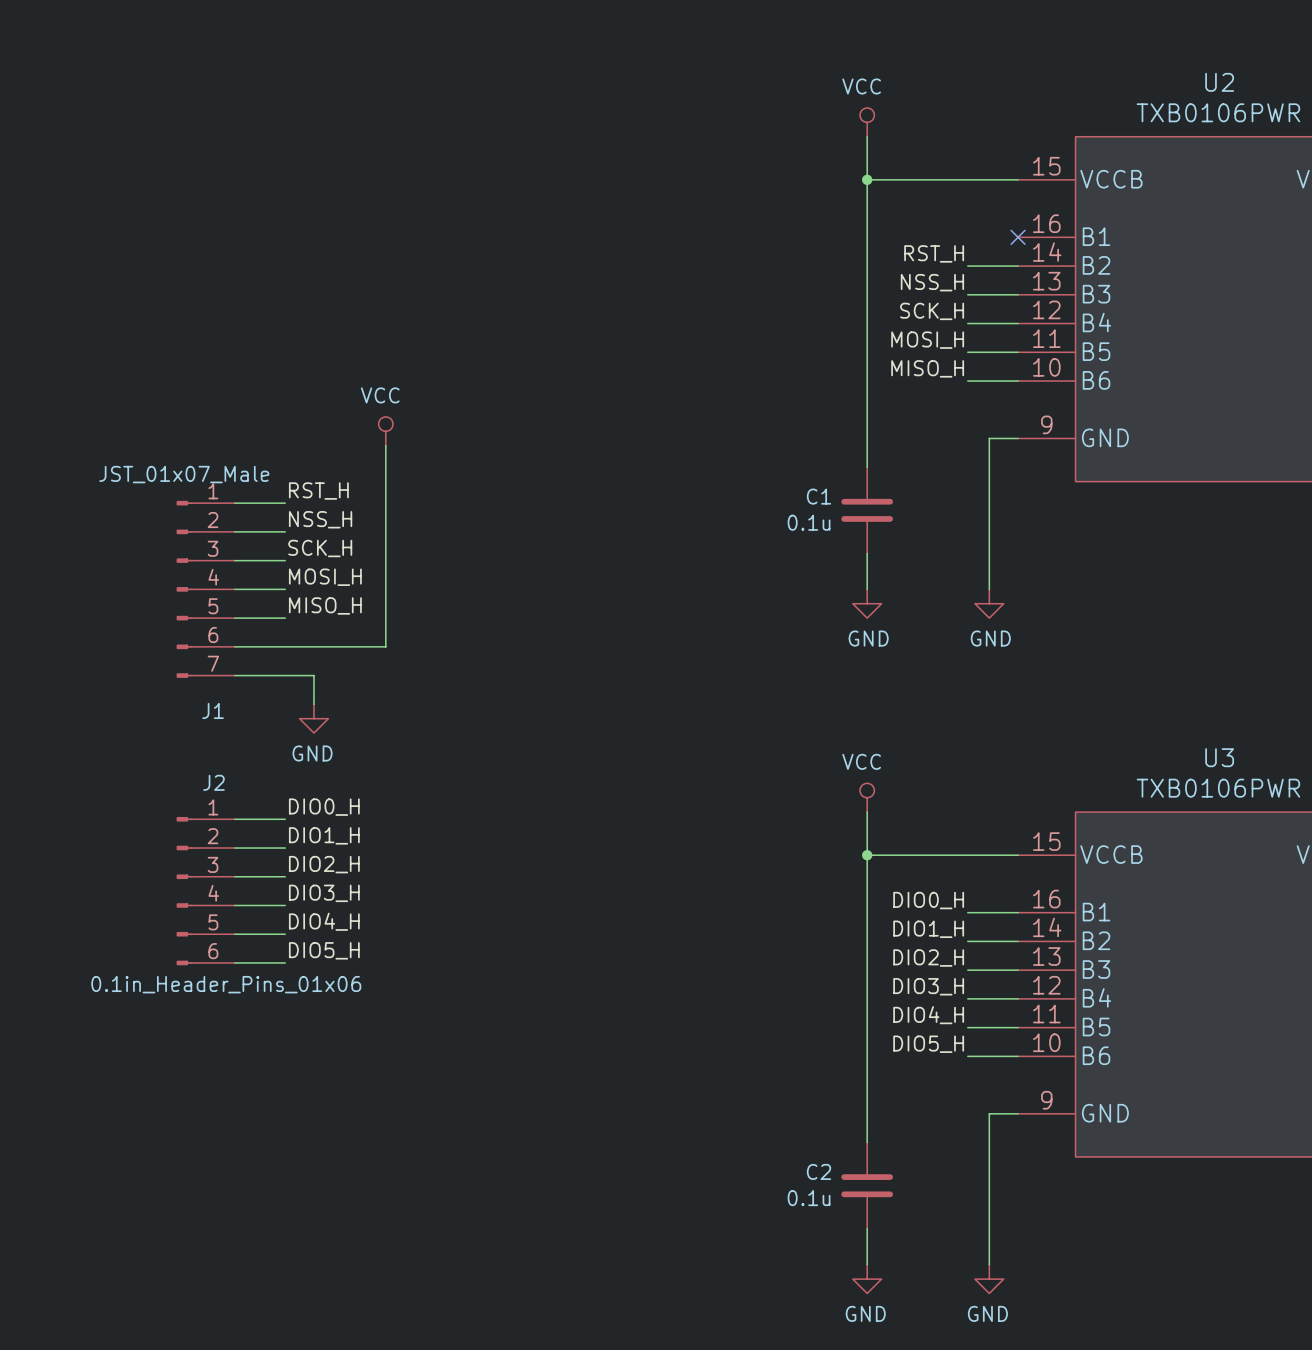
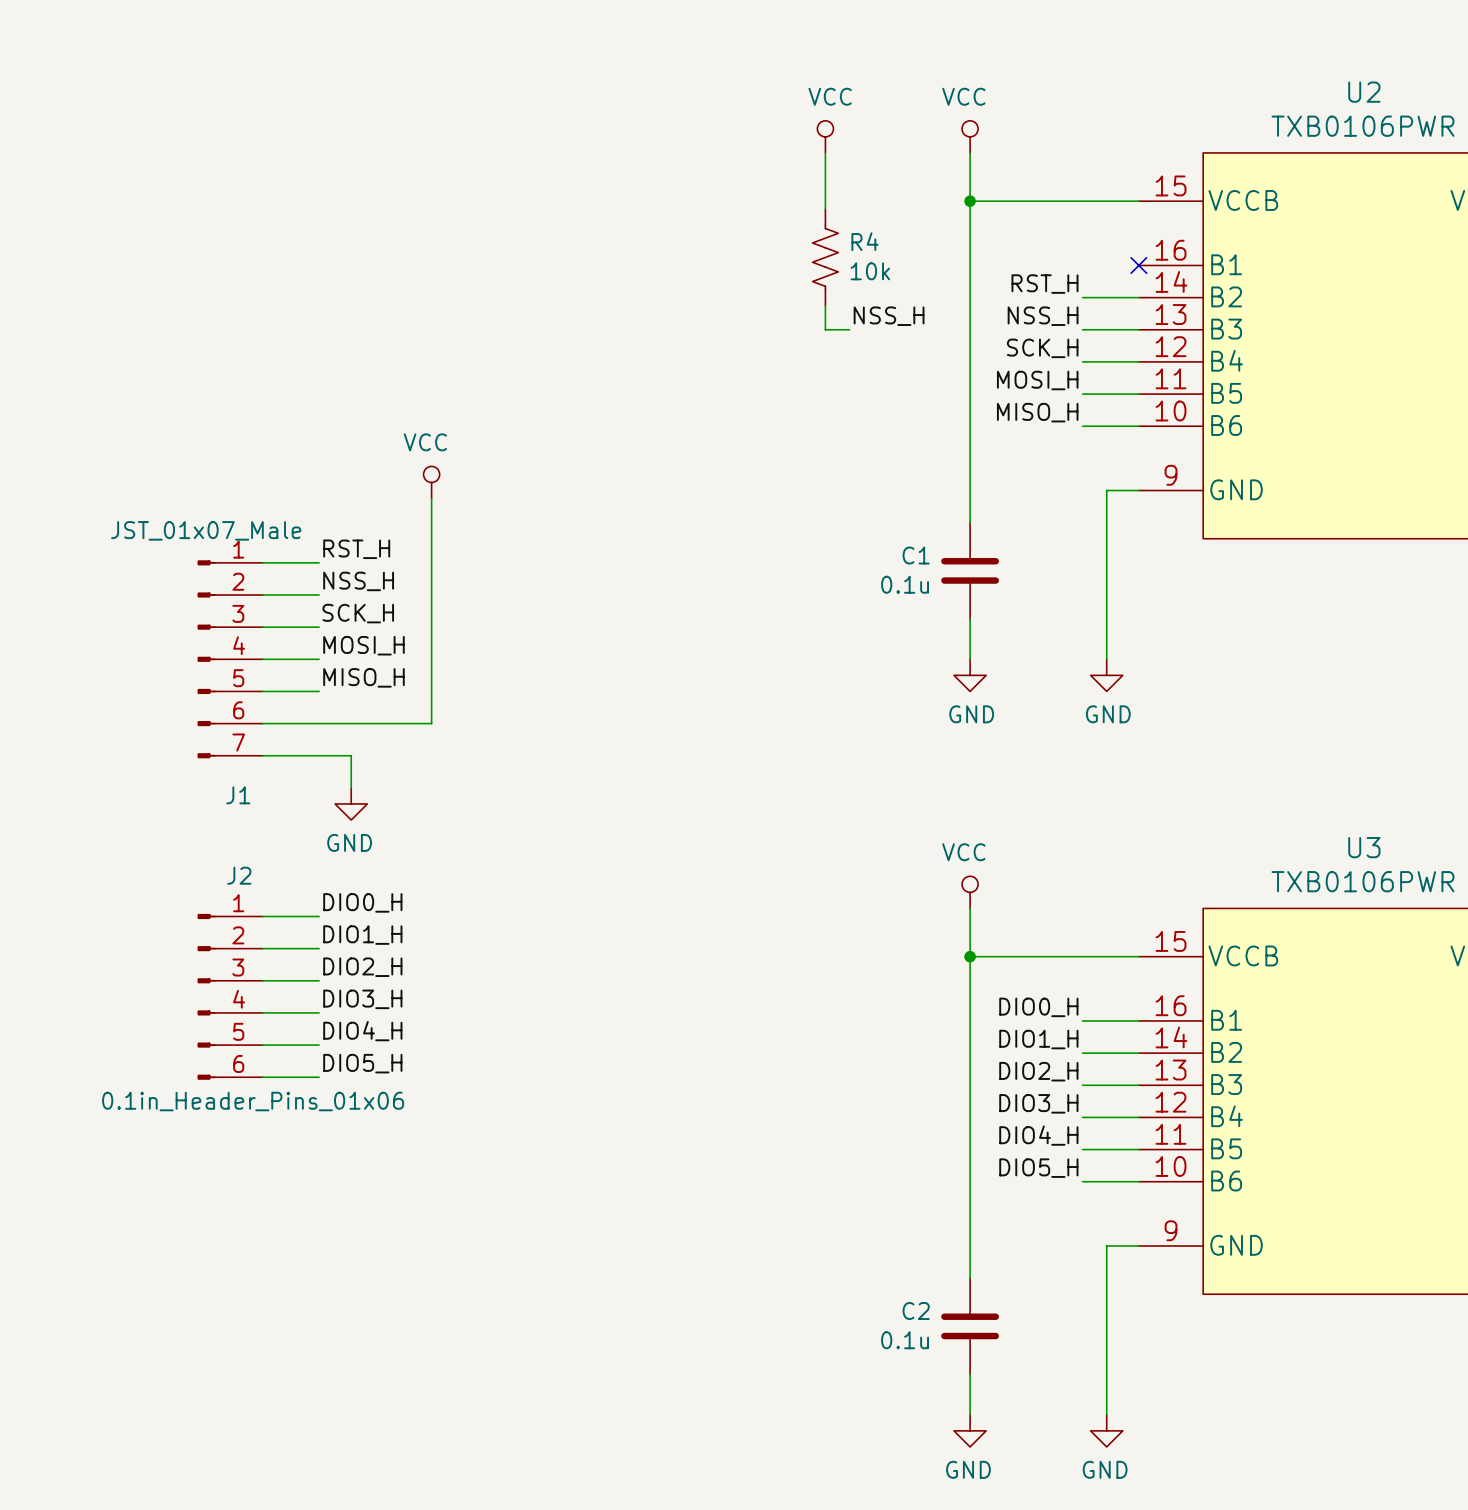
power symbol: none -> VCC (825, 136)
wire: none -> (825, 152) (825, 209)
R4: none -> 10k (825, 257)
wire: none -> (825, 305) (825, 329) (849, 329)
label: none -> NSS_H (889, 316)

